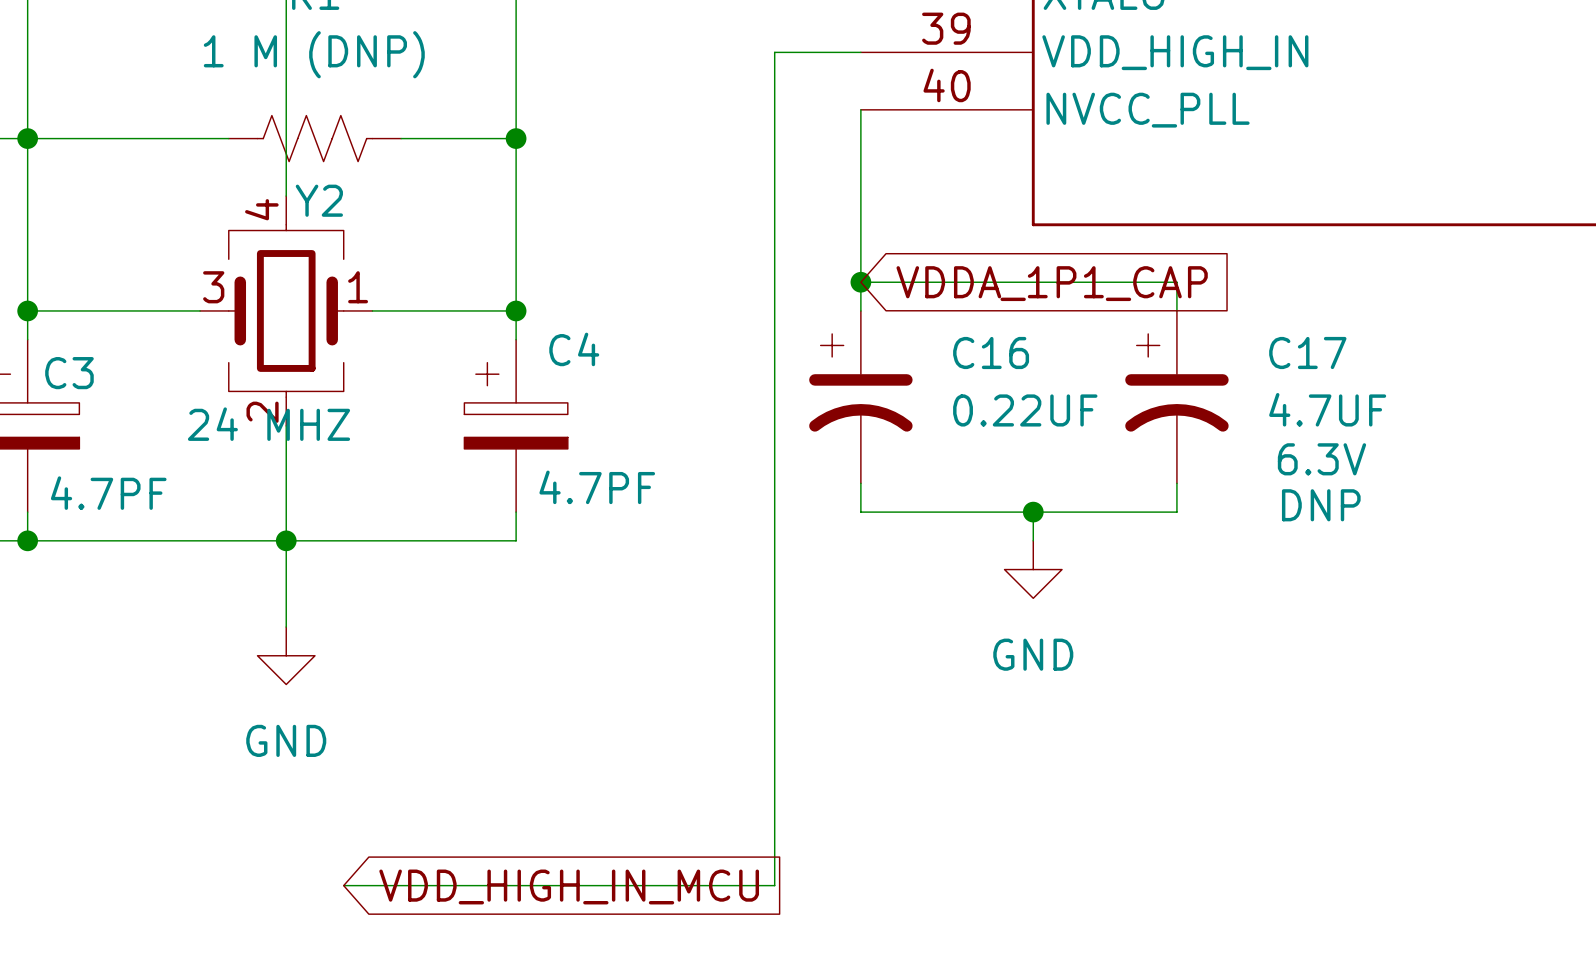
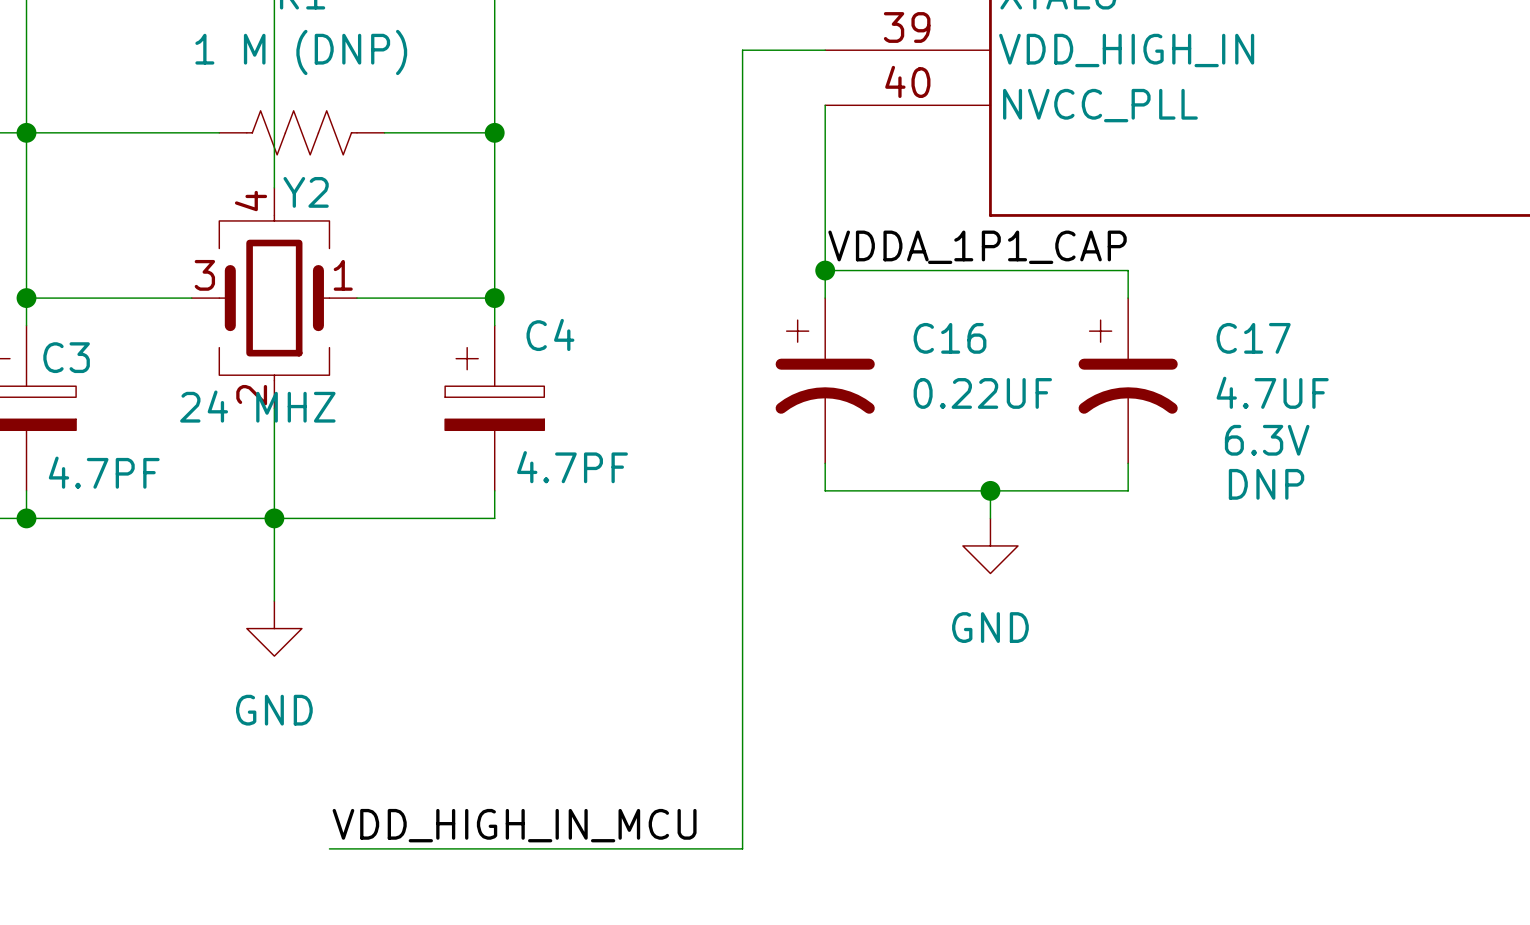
label: none -> VDDA_1P1_CAP (977, 247)
global label: VDDA_1P1_CAP (1052, 283) -> none
label: none -> VDD_HIGH_IN_MCU (514, 825)
global label: VDD_HIGH_IN_MCU (569, 886) -> none

